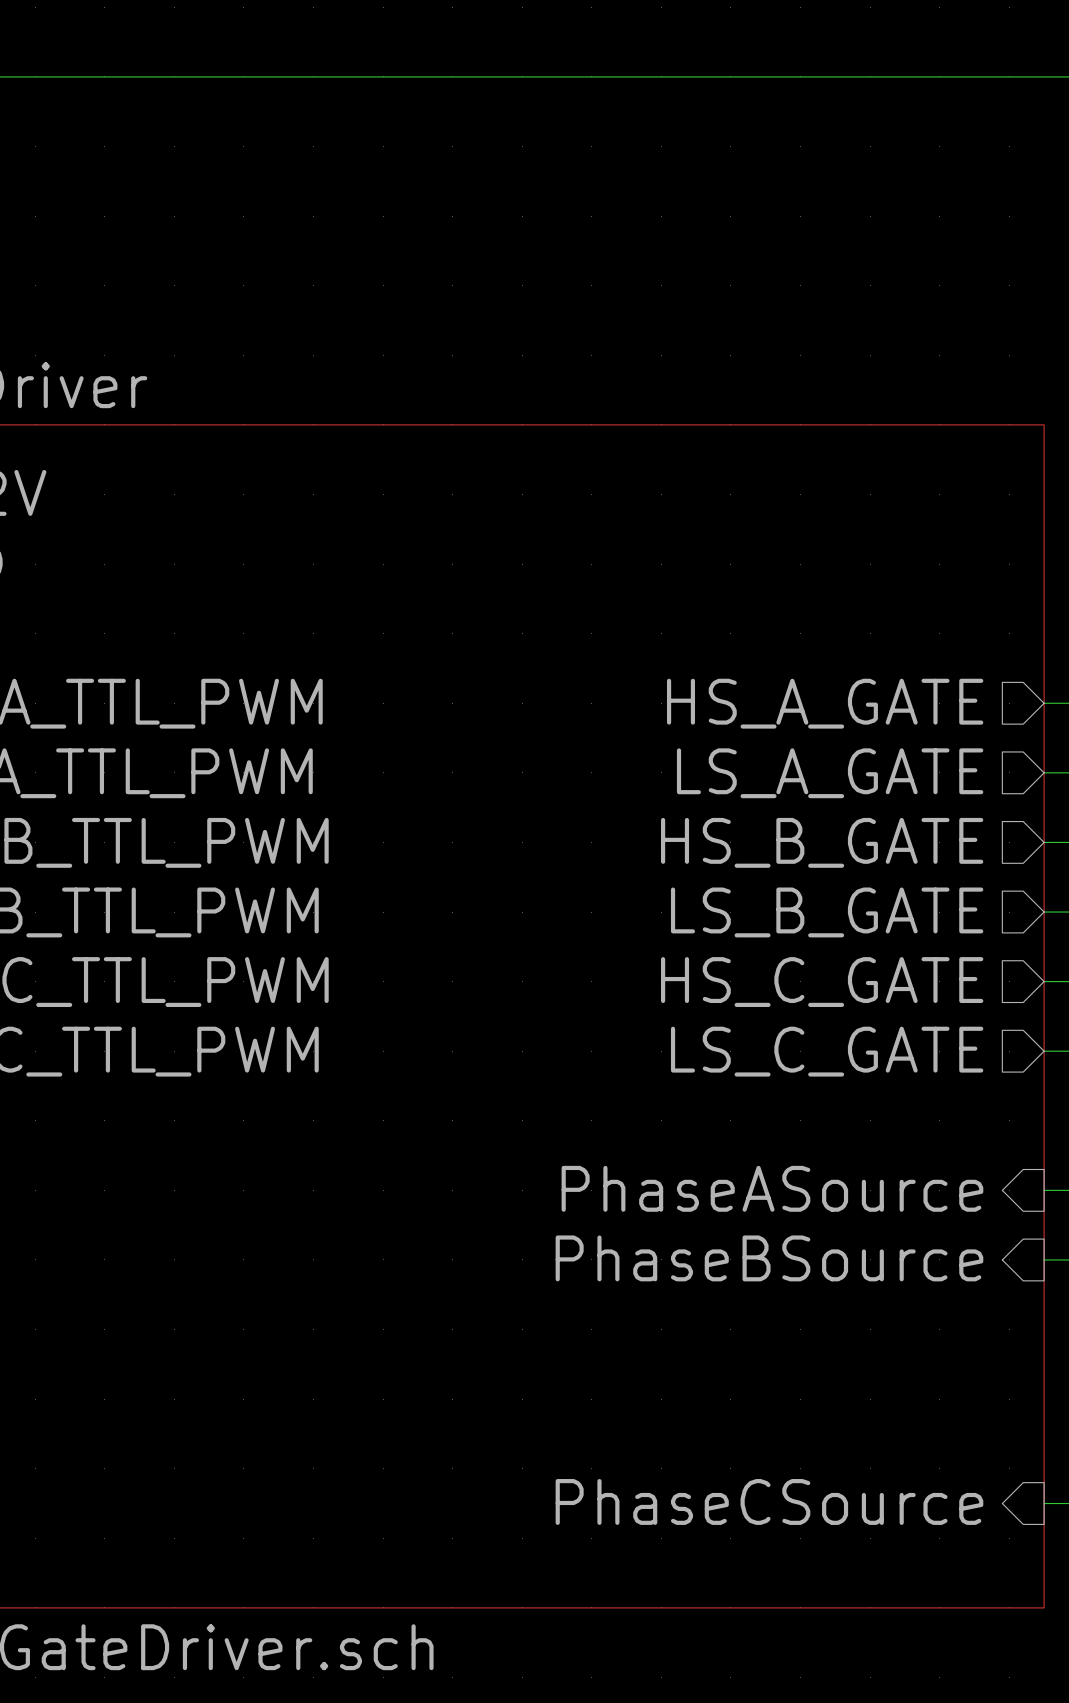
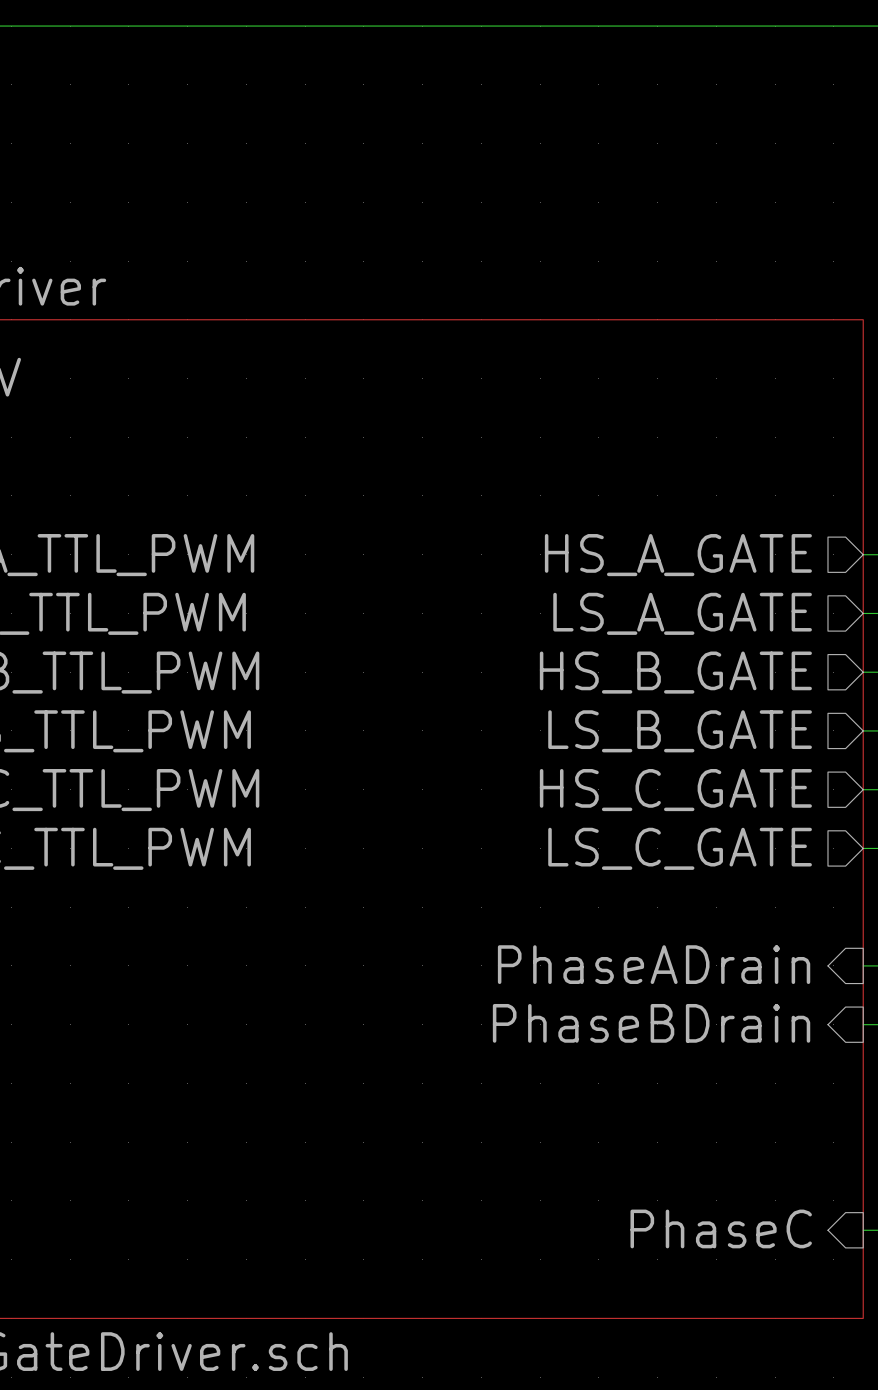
sheet pin: PhaseASource (772, 1188) -> PhaseADrain (654, 964)
sheet pin: PhaseBSource (769, 1258) -> PhaseBDrain (651, 1023)
sheet pin: PhaseCSource (769, 1501) -> PhaseC (721, 1228)

